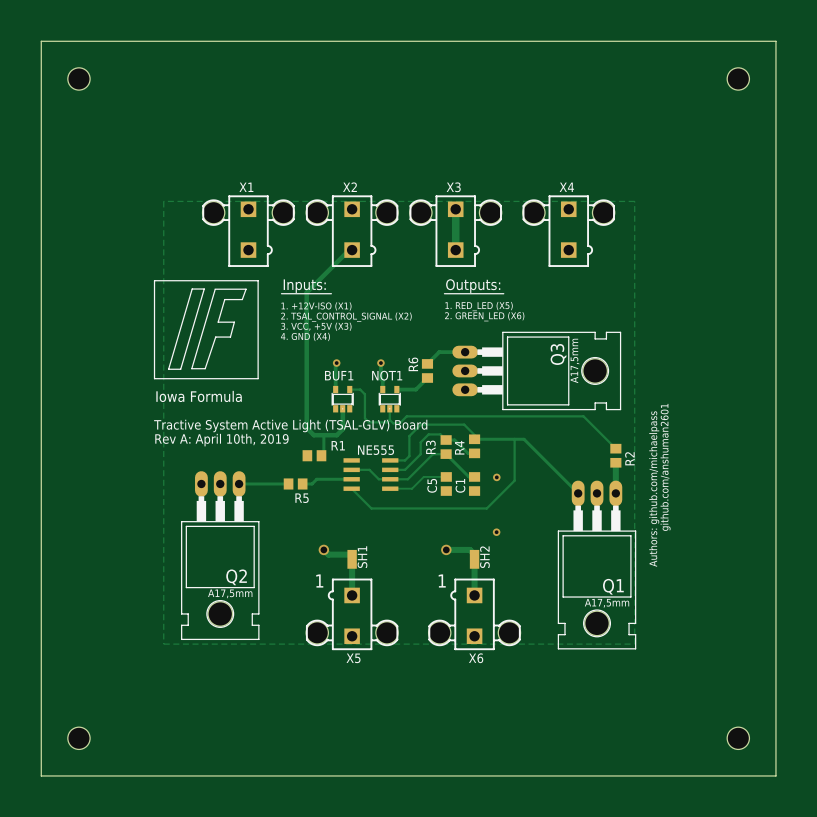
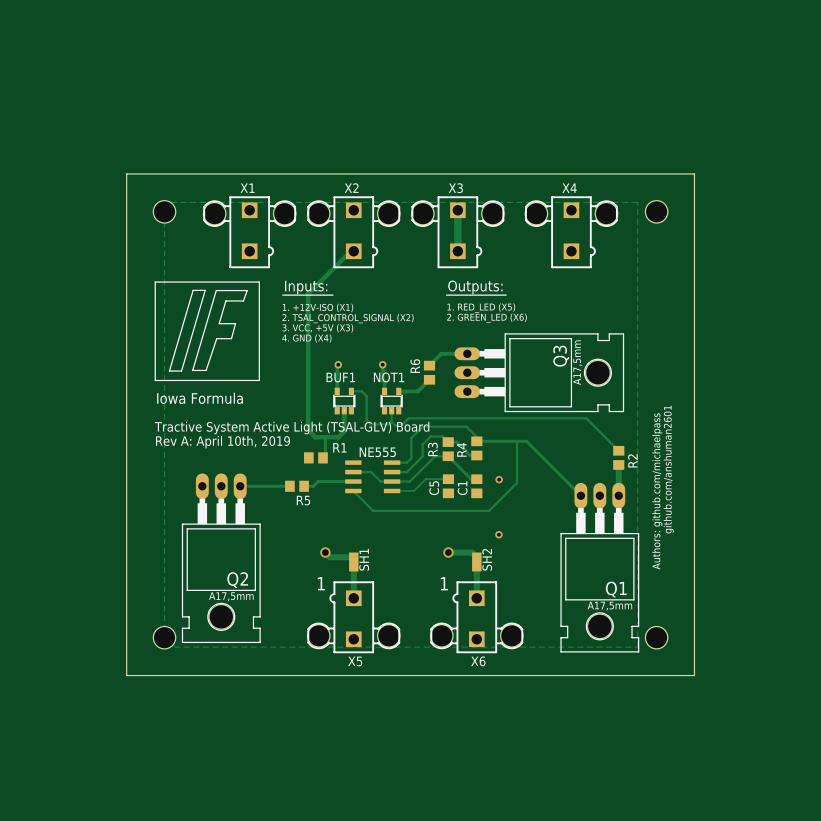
board edge: (41, 41) (775, 41) (775, 775) (41, 775) (41, 41) -> (126, 173) (126, 675) (694, 675) (694, 173) (126, 173)
hole position: (78, 78) -> (164, 211)
hole position: (738, 78) -> (656, 211)
hole position: (78, 738) -> (164, 637)
hole position: (738, 738) -> (656, 637)

